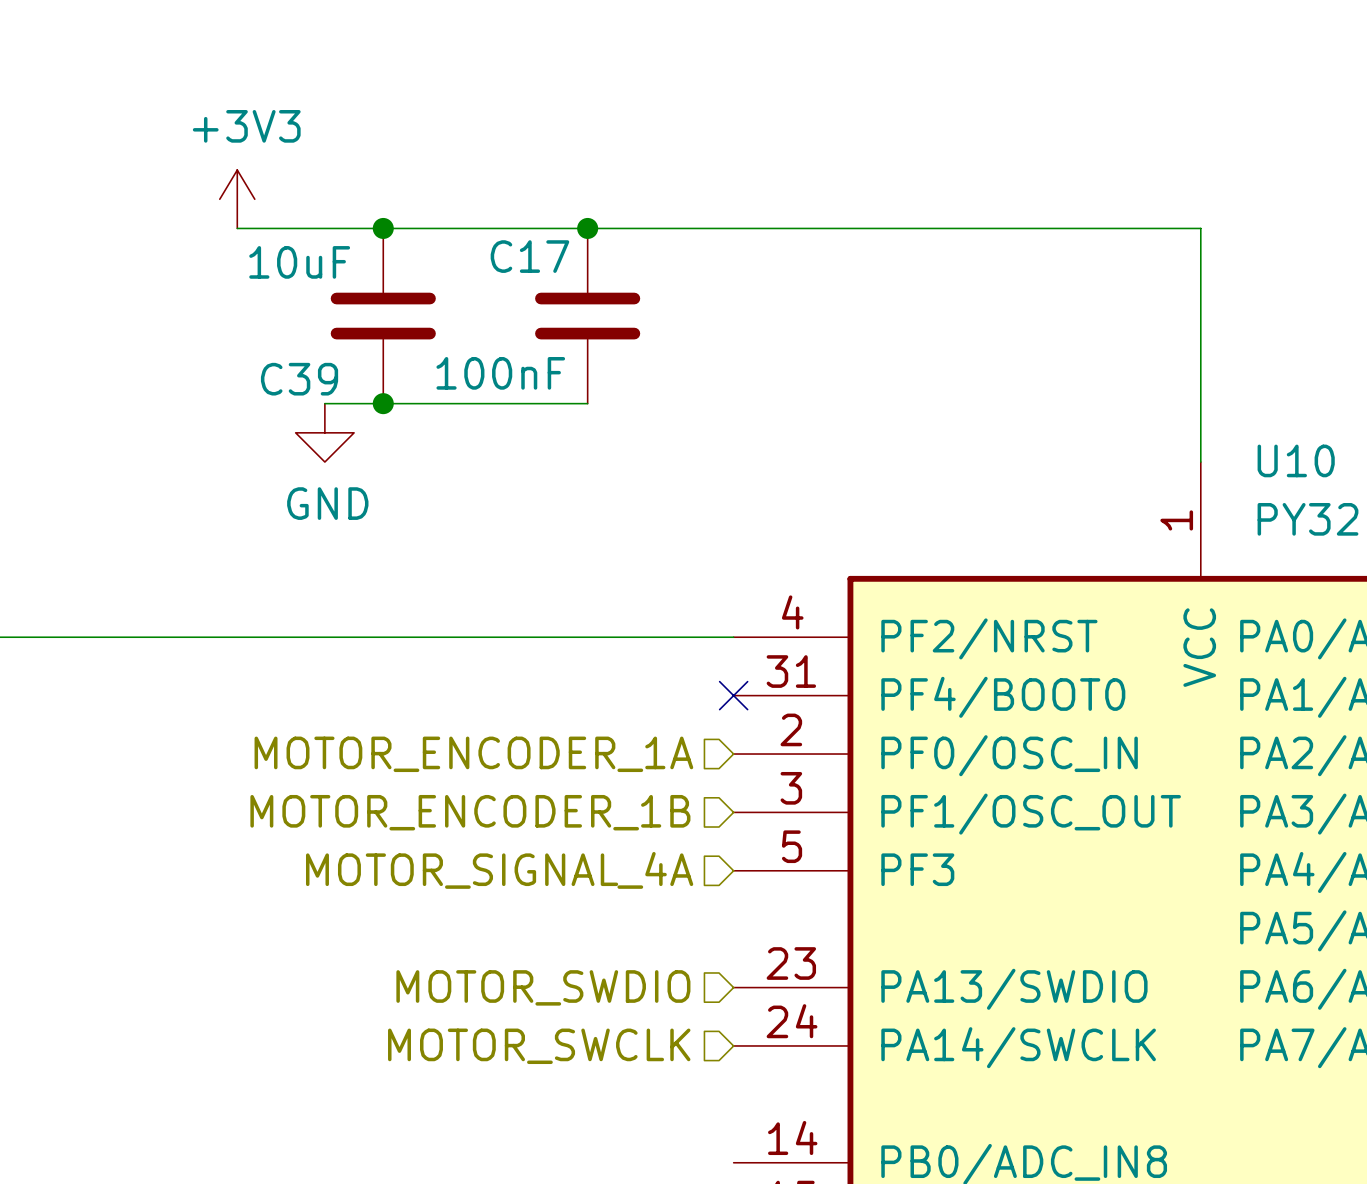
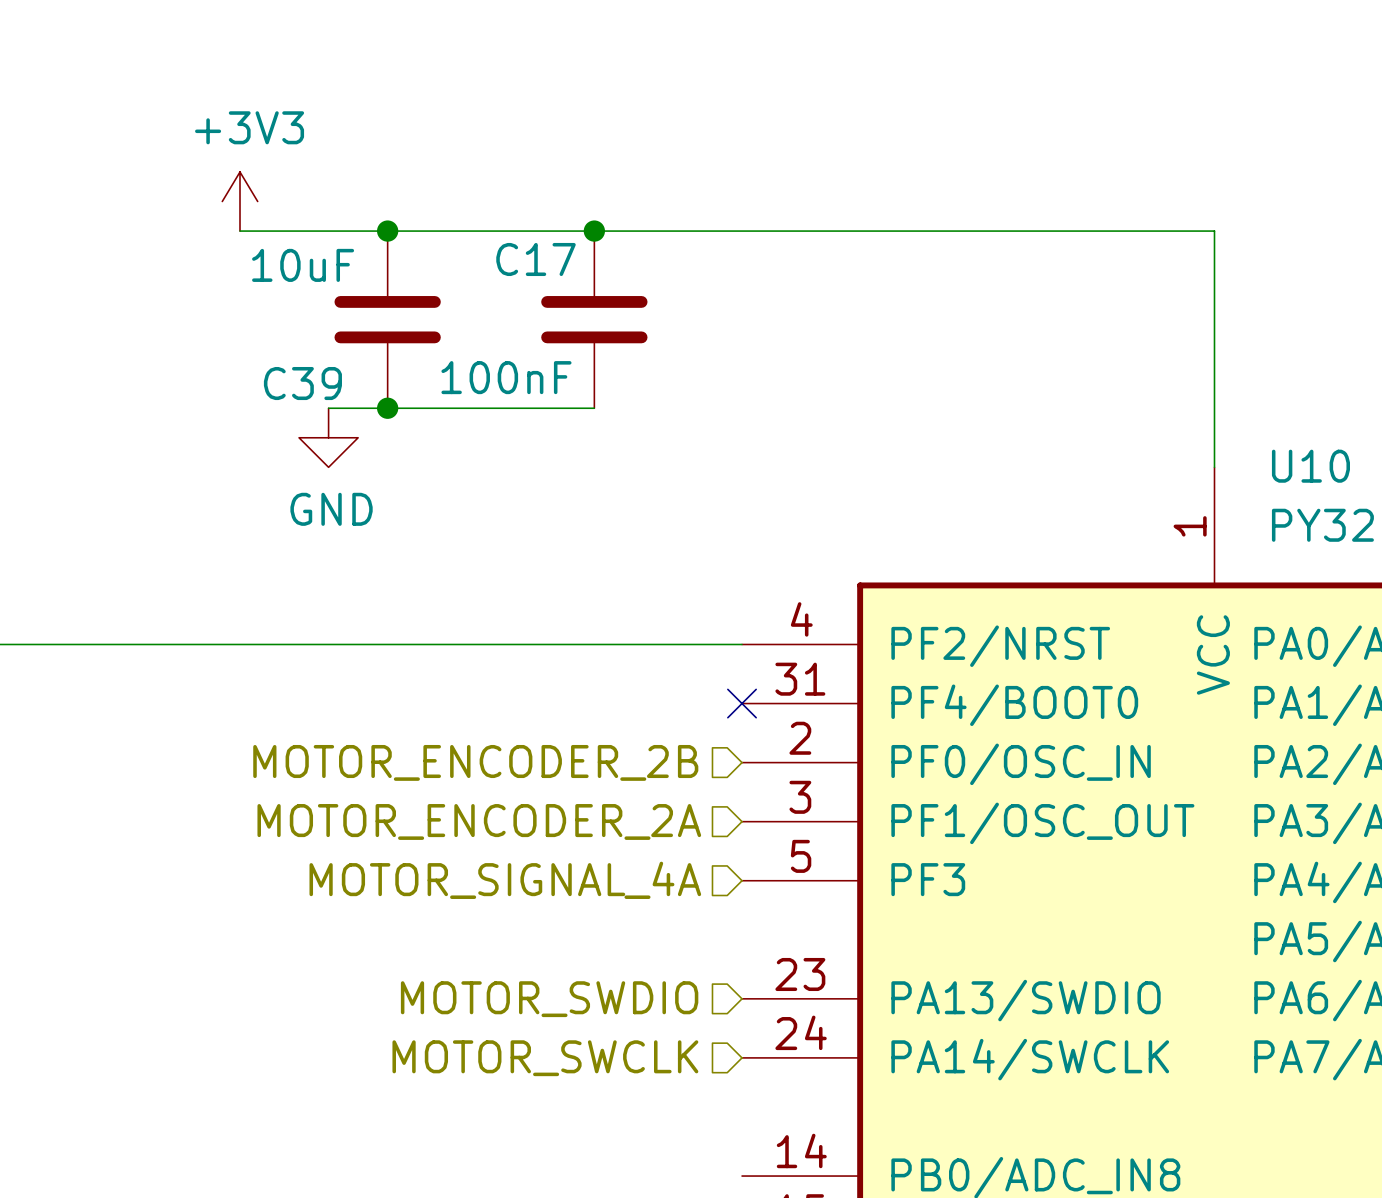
hierarchical label: MOTOR_ENCODER_1A (473, 754) -> MOTOR_ENCODER_2B (475, 762)
hierarchical label: MOTOR_ENCODER_1B (470, 812) -> MOTOR_ENCODER_2A (479, 821)

